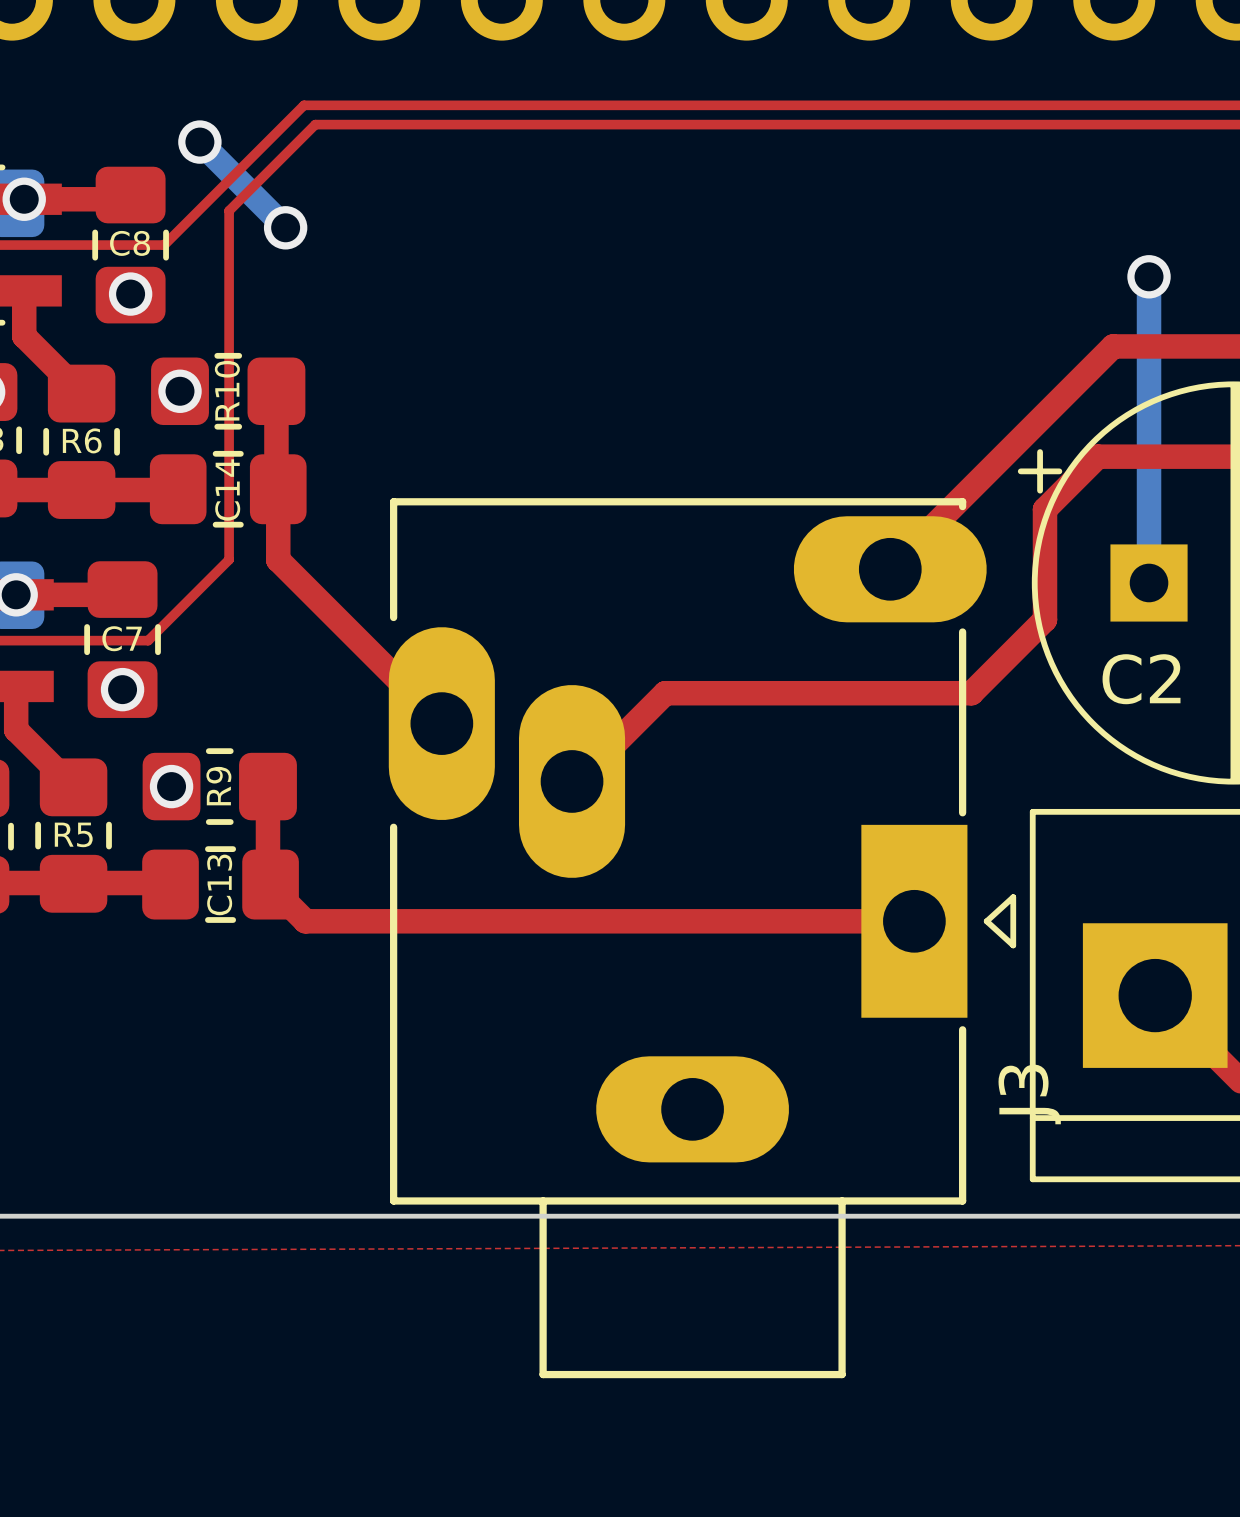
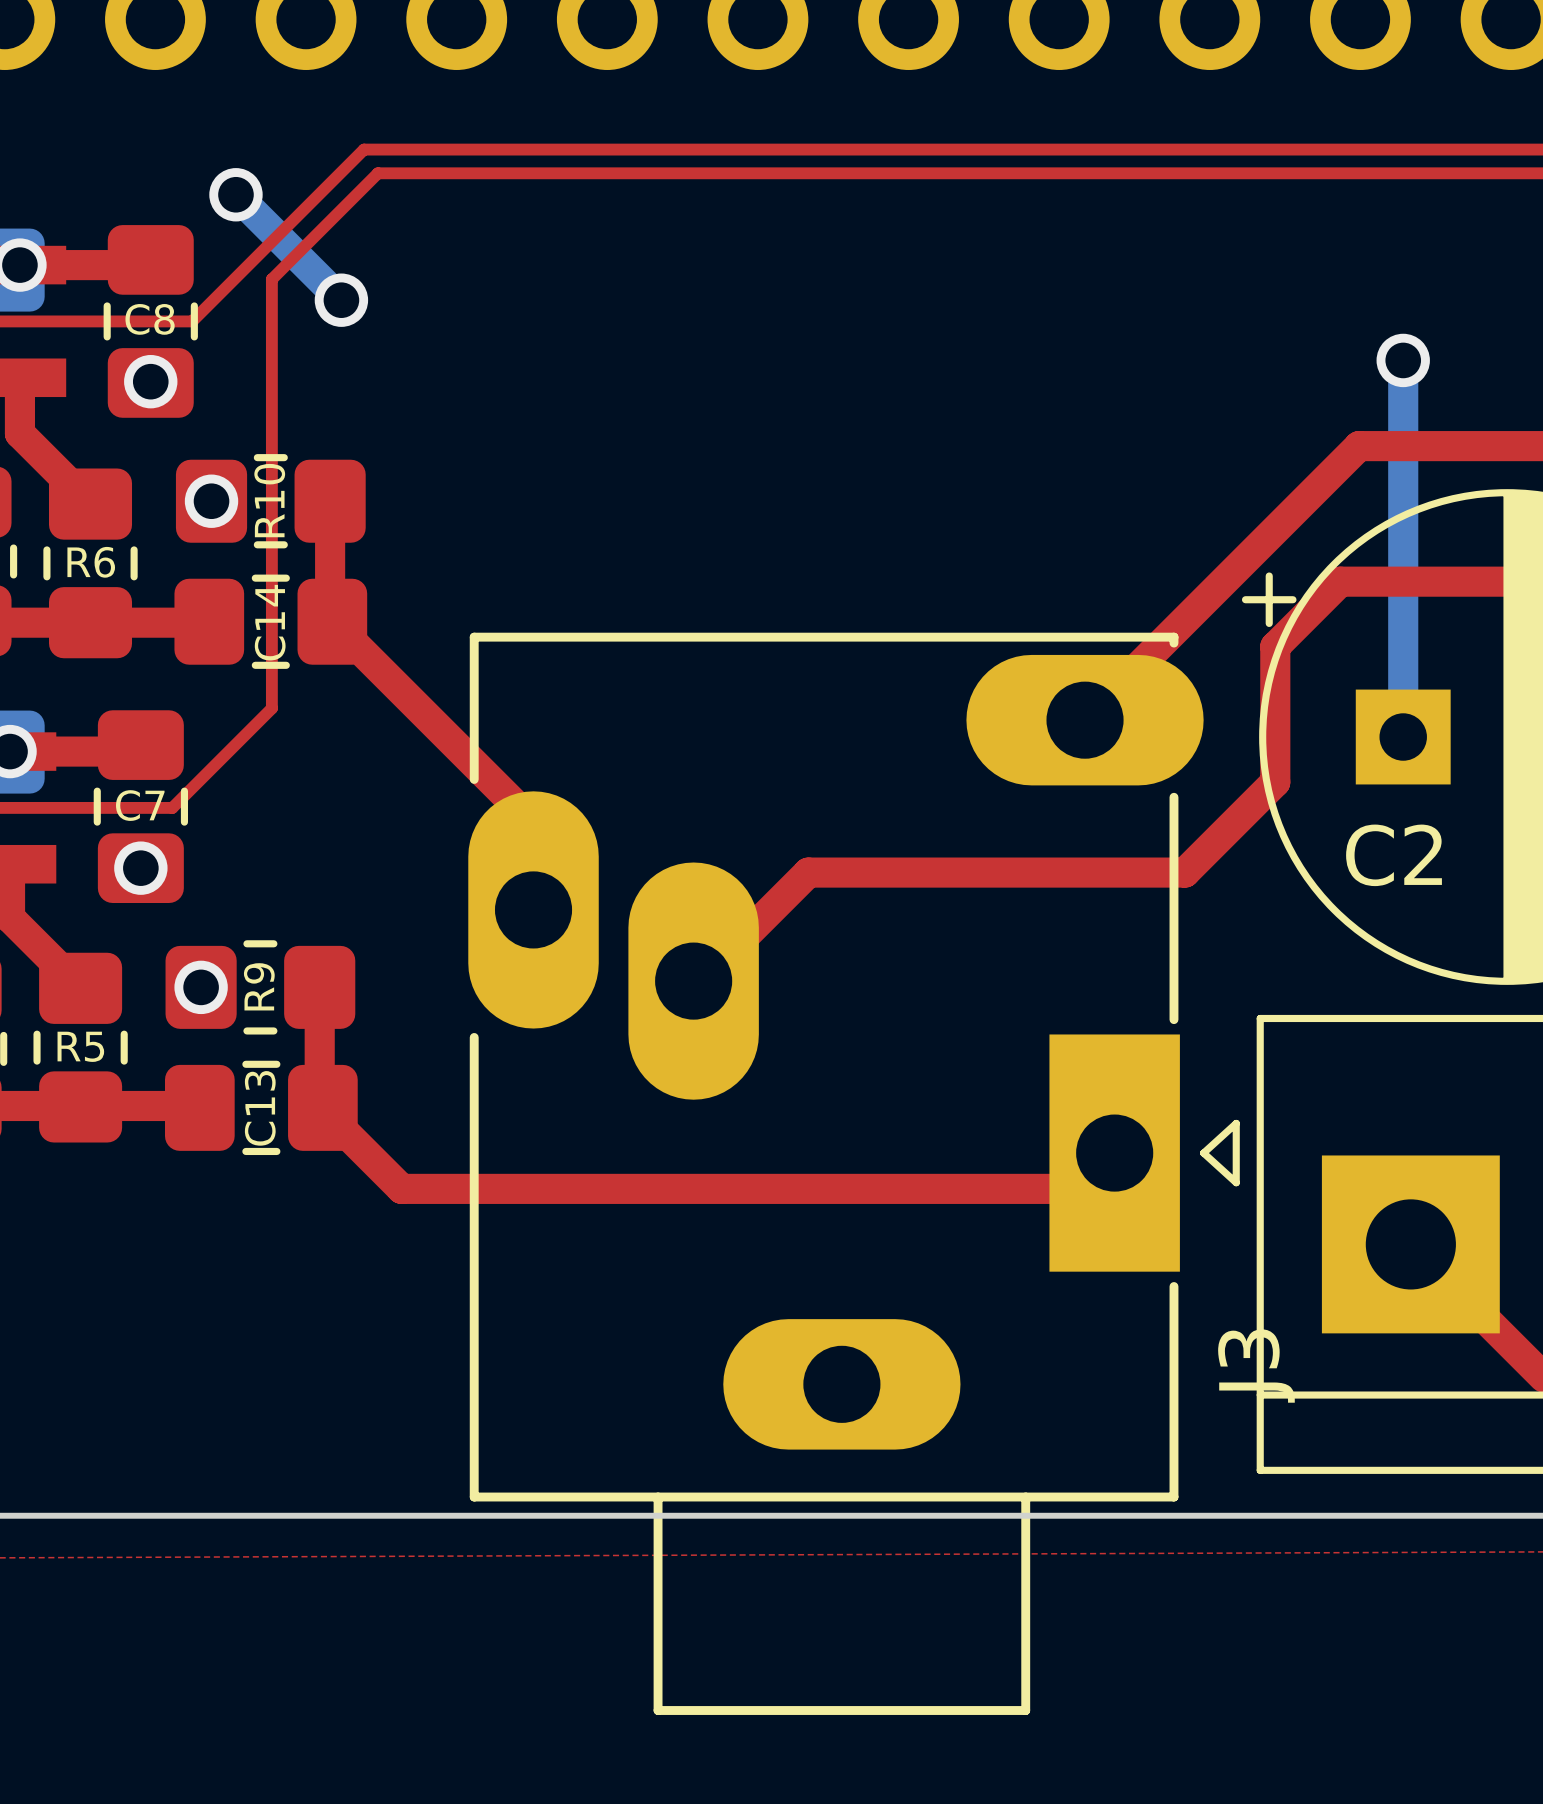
top track: (278, 489) (278, 560) (441, 723) -> (332, 621) (533, 822)
top track: (305, 921) (914, 921) -> (365, 1153) (401, 1188) (1078, 1188)

